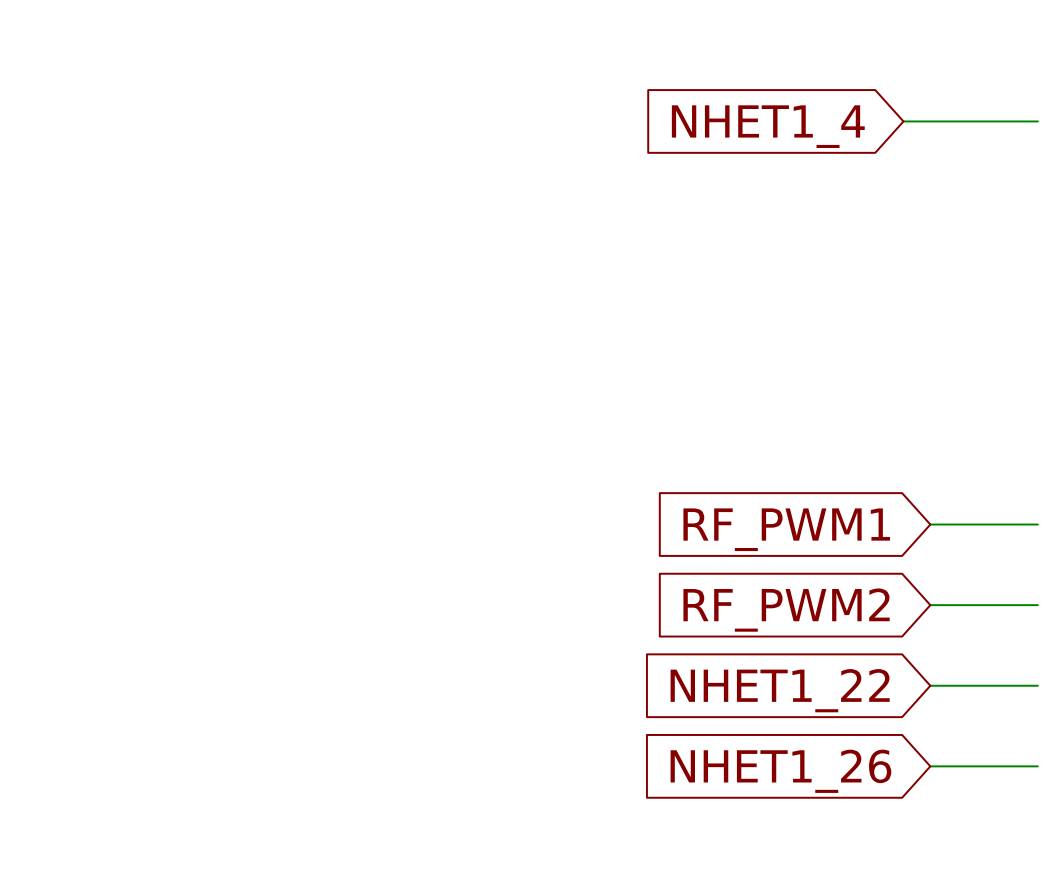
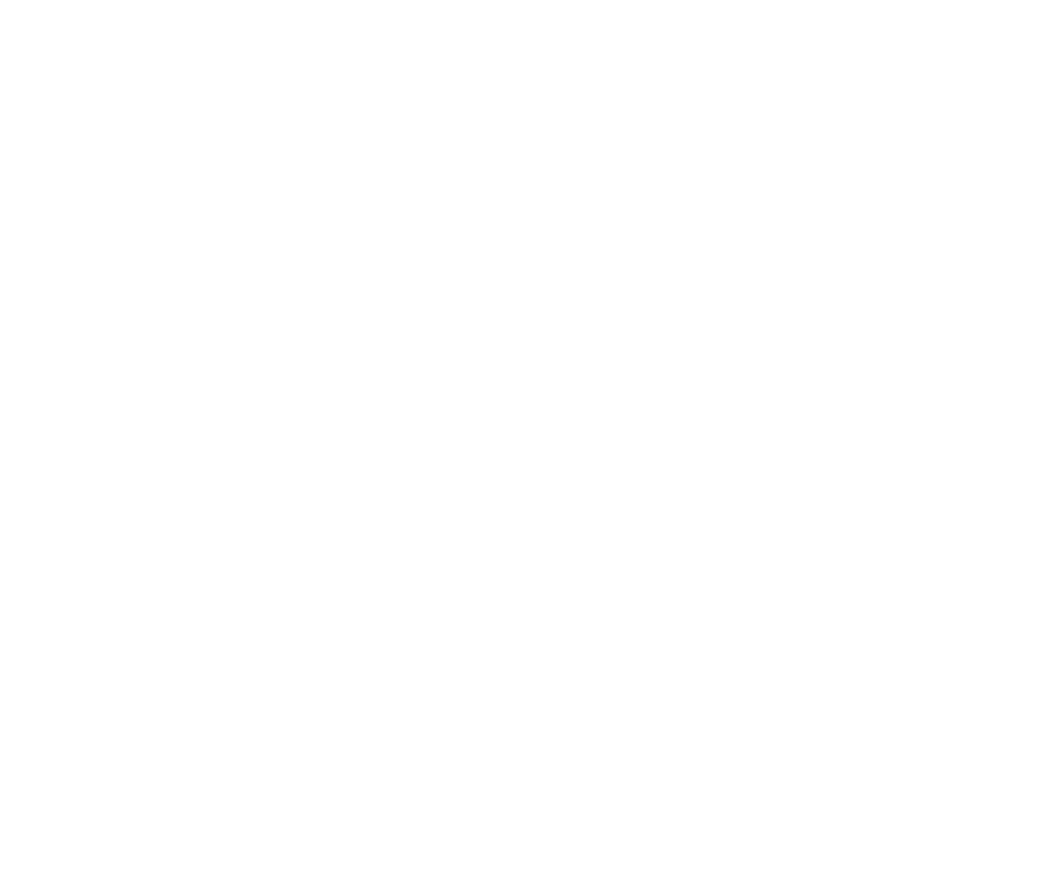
wire: (903, 121) (1037, 121) -> none
global label: NHET1_4 (768, 126) -> none
wire: (930, 524) (1037, 524) -> none
global label: RF_PWM1 (786, 529) -> none
wire: (930, 605) (1037, 605) -> none
global label: RF_PWM2 (786, 610) -> none
wire: (930, 685) (1037, 685) -> none
global label: NHET1_22 (780, 690) -> none
wire: (930, 766) (1037, 766) -> none
global label: NHET1_26 (780, 771) -> none

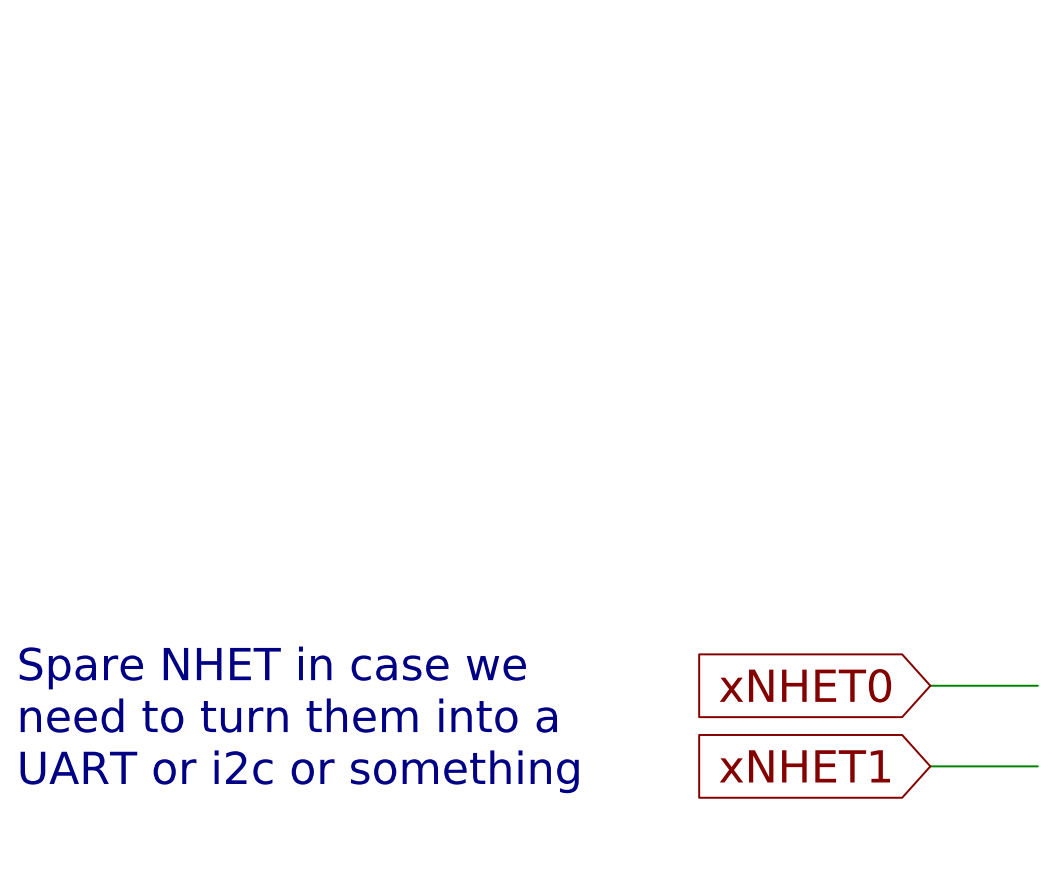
text: none -> Spare NHET in case we (272, 667)
global label: none -> xNHET0 (805, 685)
wire: none -> (930, 685) (1037, 685)
text: none -> need to turn them into a (288, 715)
global label: none -> xNHET1 (804, 766)
wire: none -> (930, 766) (1037, 766)
text: none -> UART or i2c or something (299, 771)

